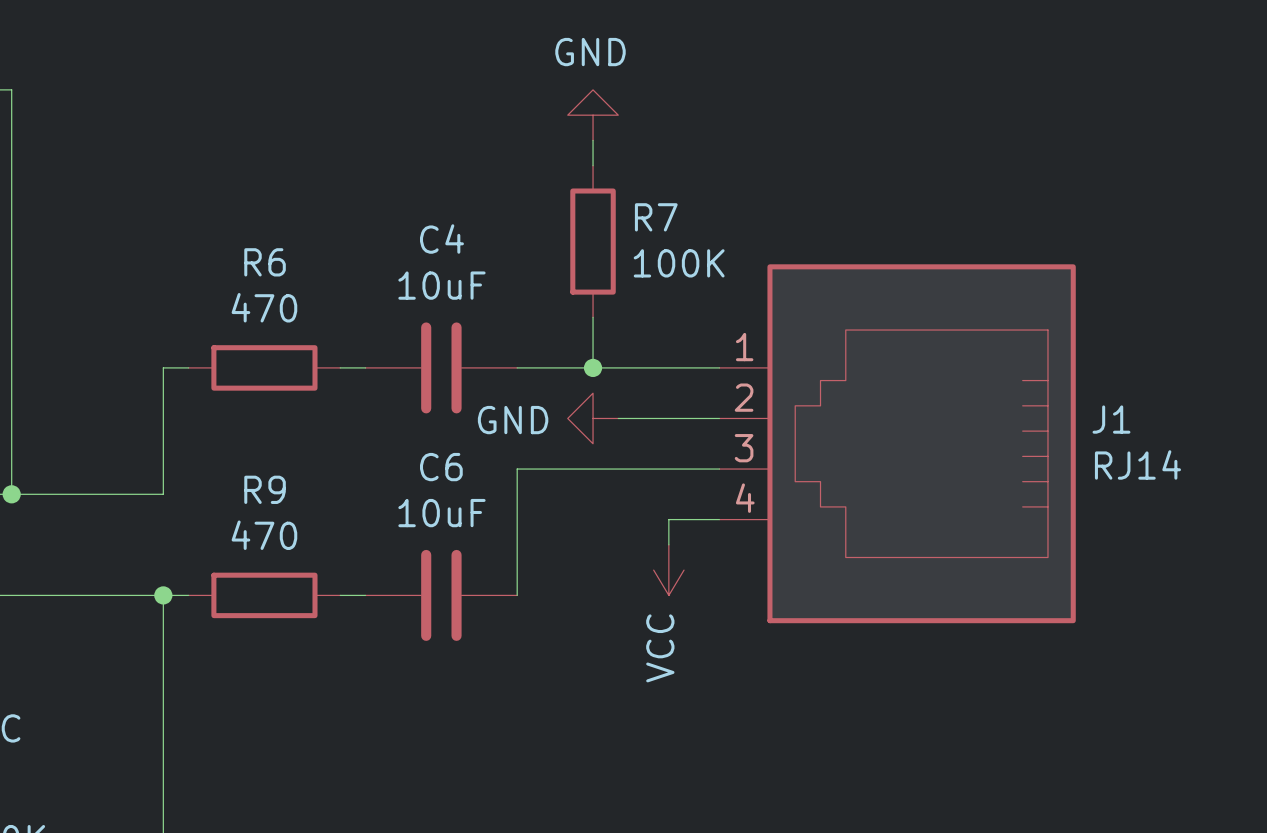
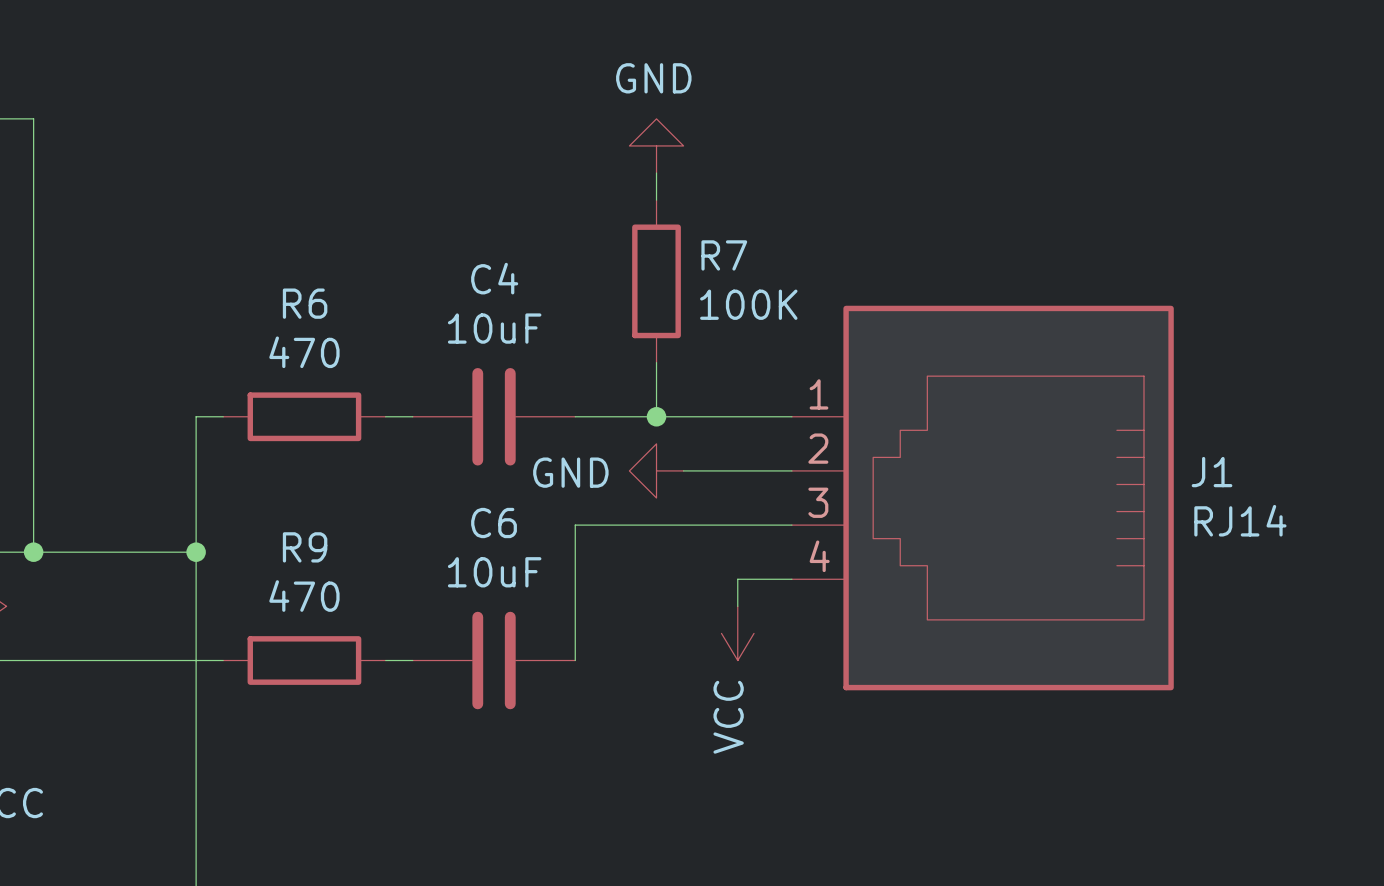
wire: none -> (196, 552) (196, 660)
junction position: (163, 595) -> (196, 552)

